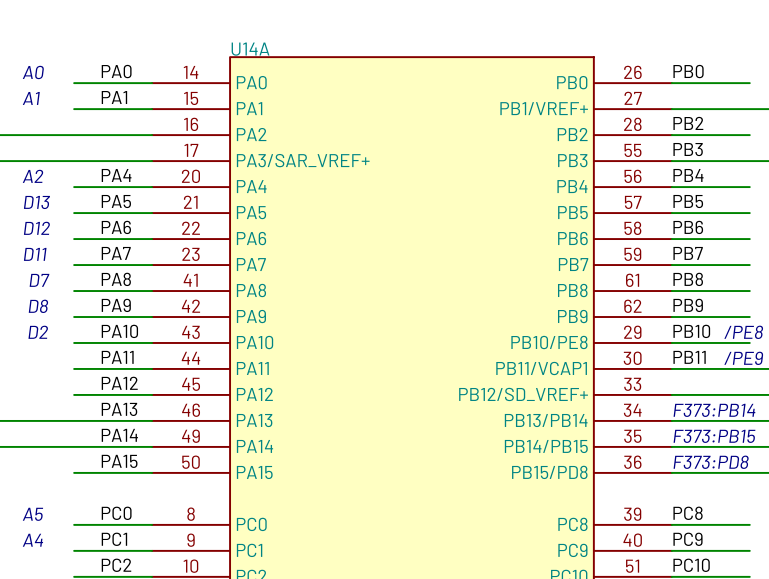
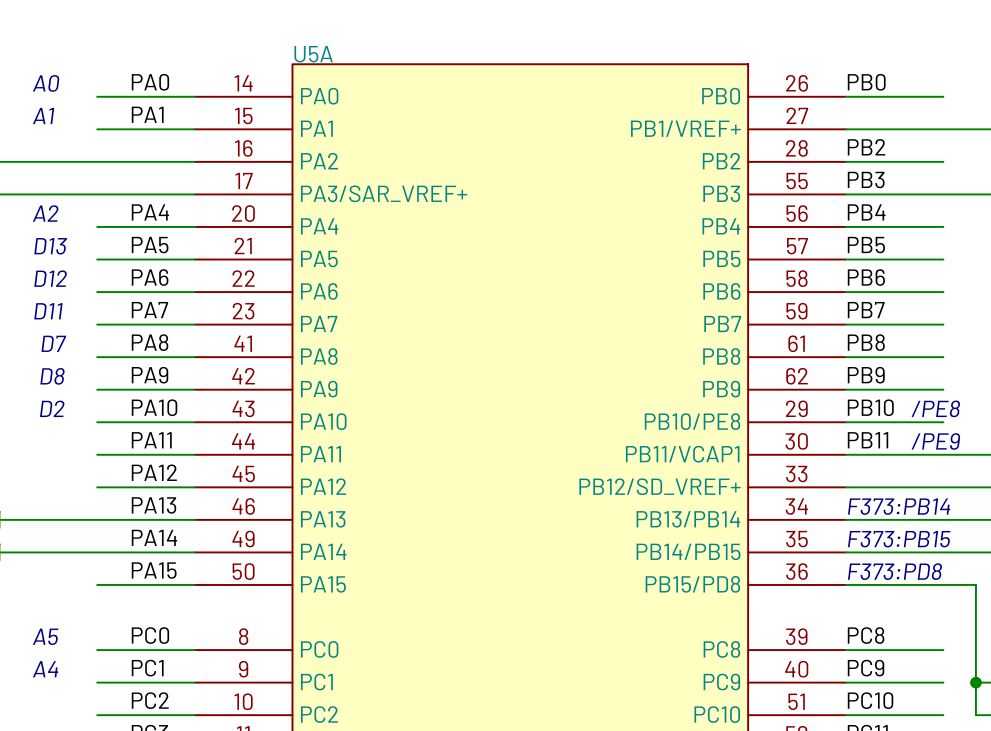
U14A name: U14A (250, 49) -> U5A (313, 54)

